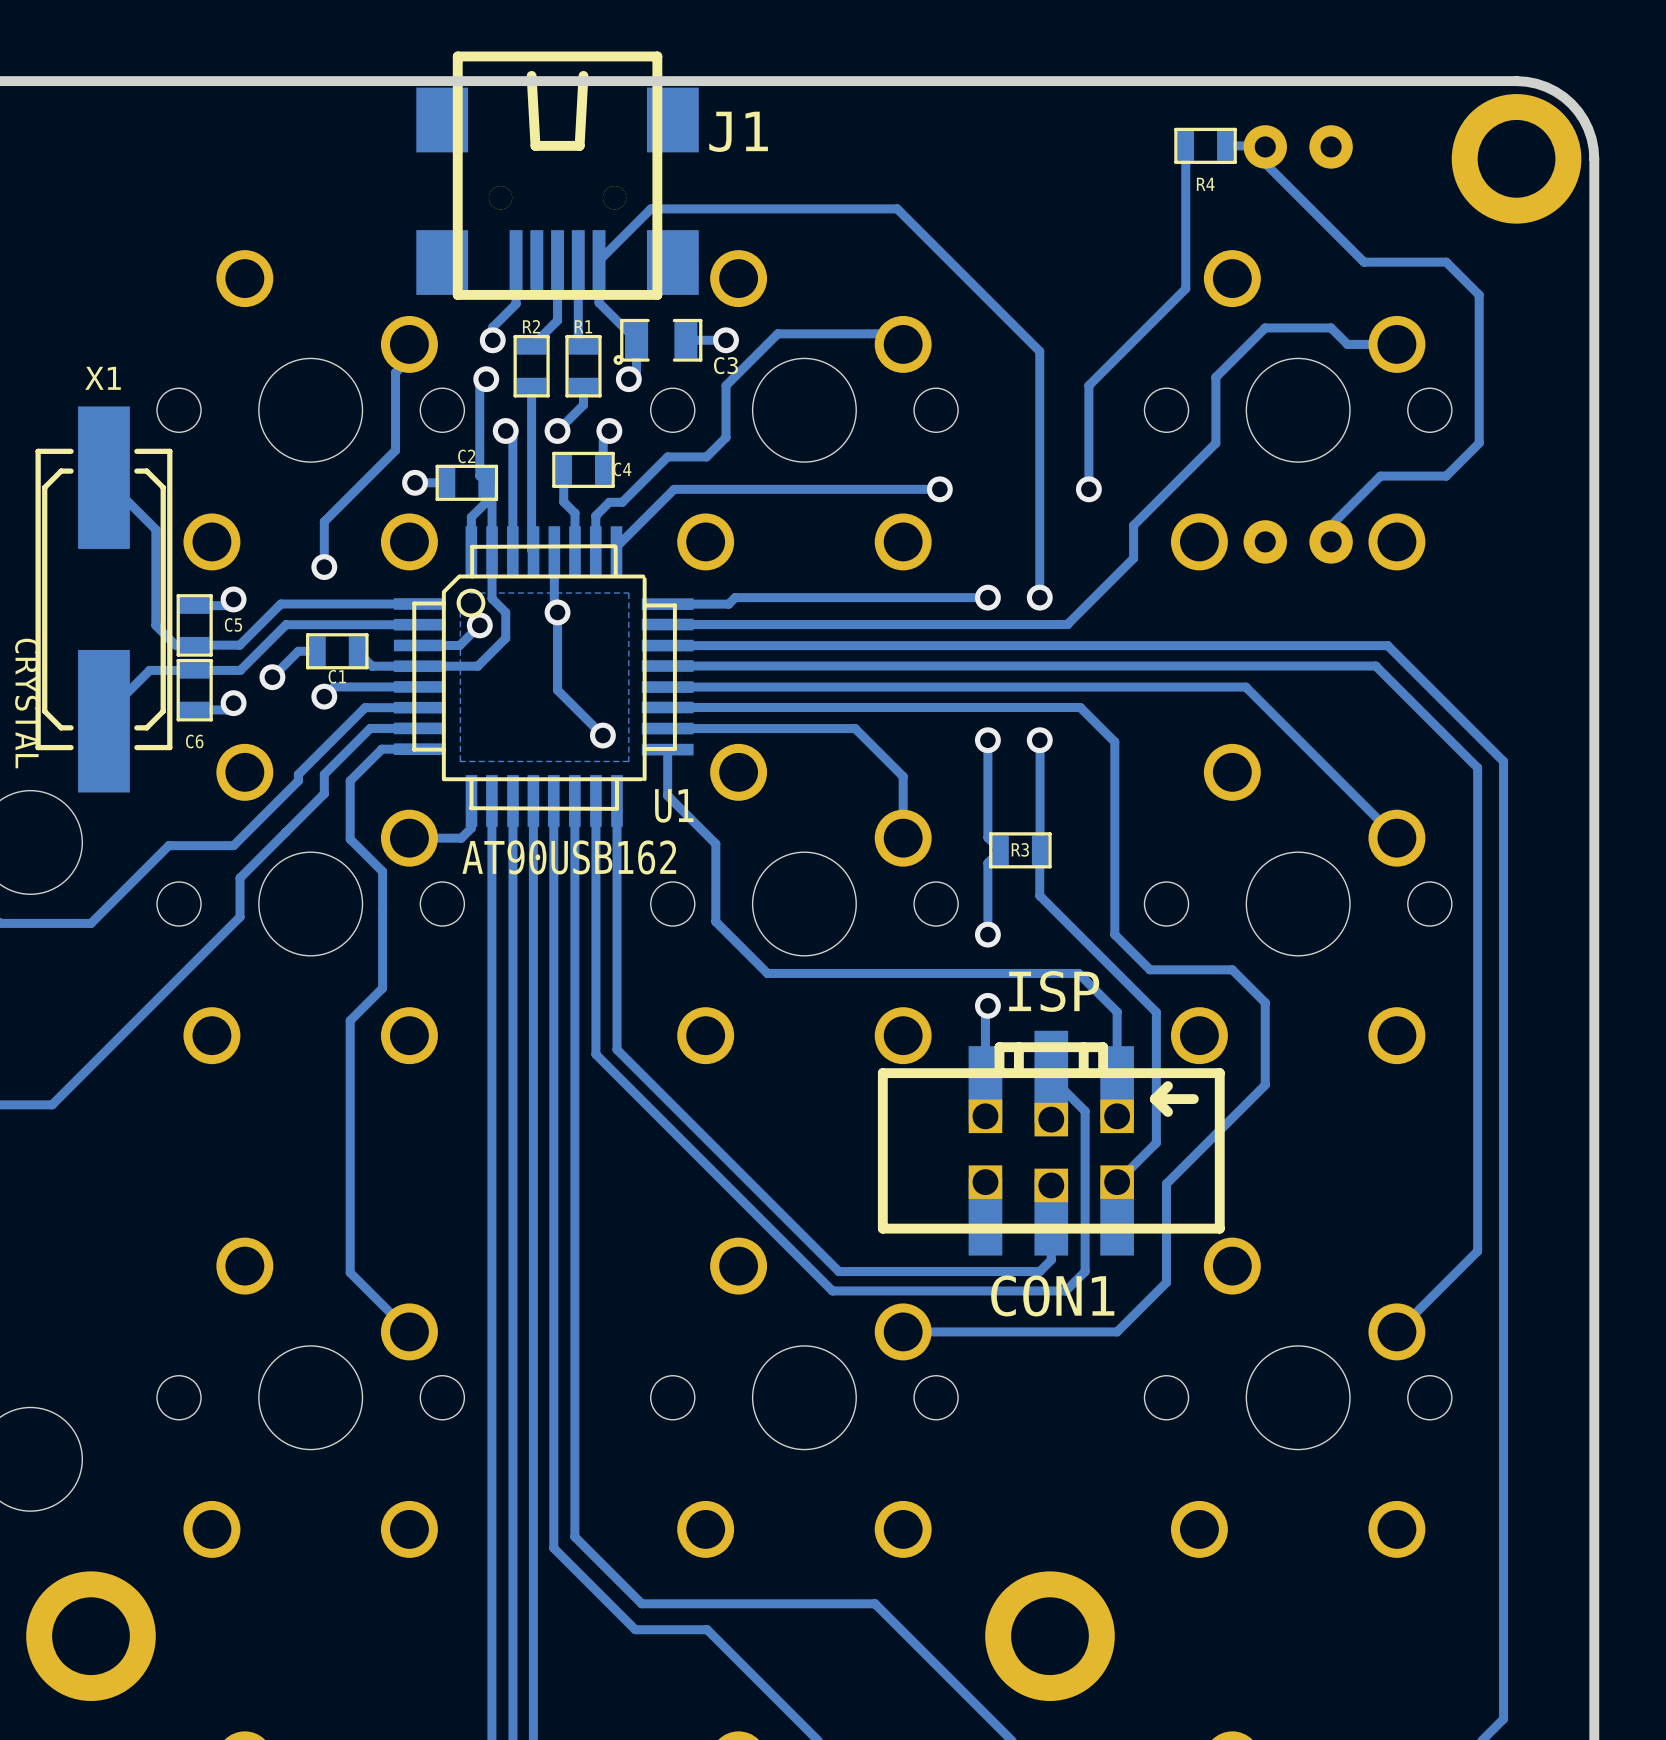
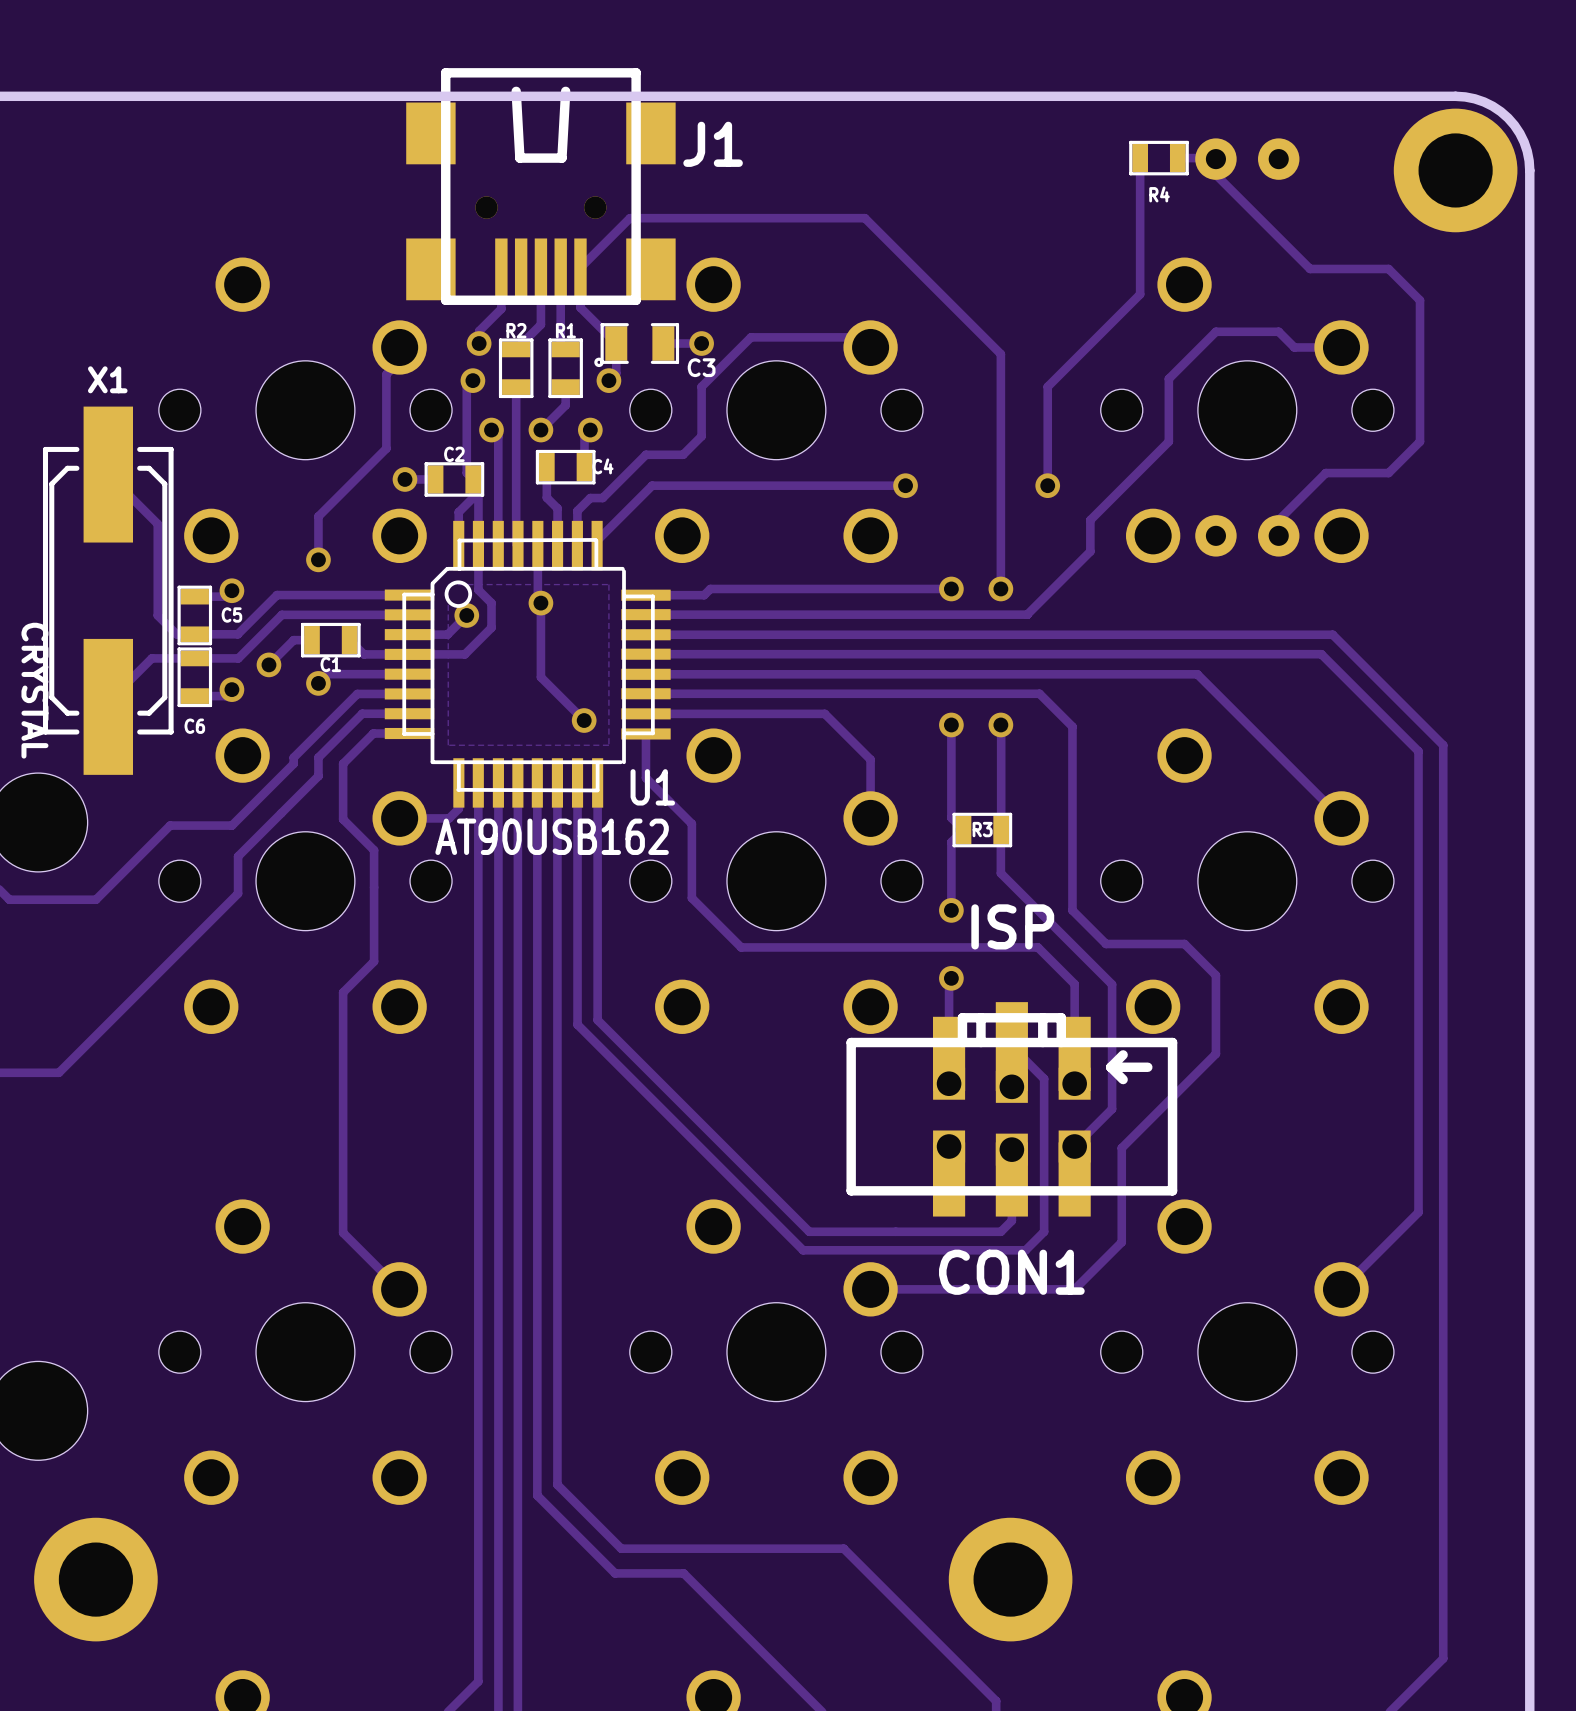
CON1 value position: ISP (1054, 991) -> ISP (1012, 926)
CON1 name position: CON1 (1052, 1295) -> CON1 (1011, 1272)

